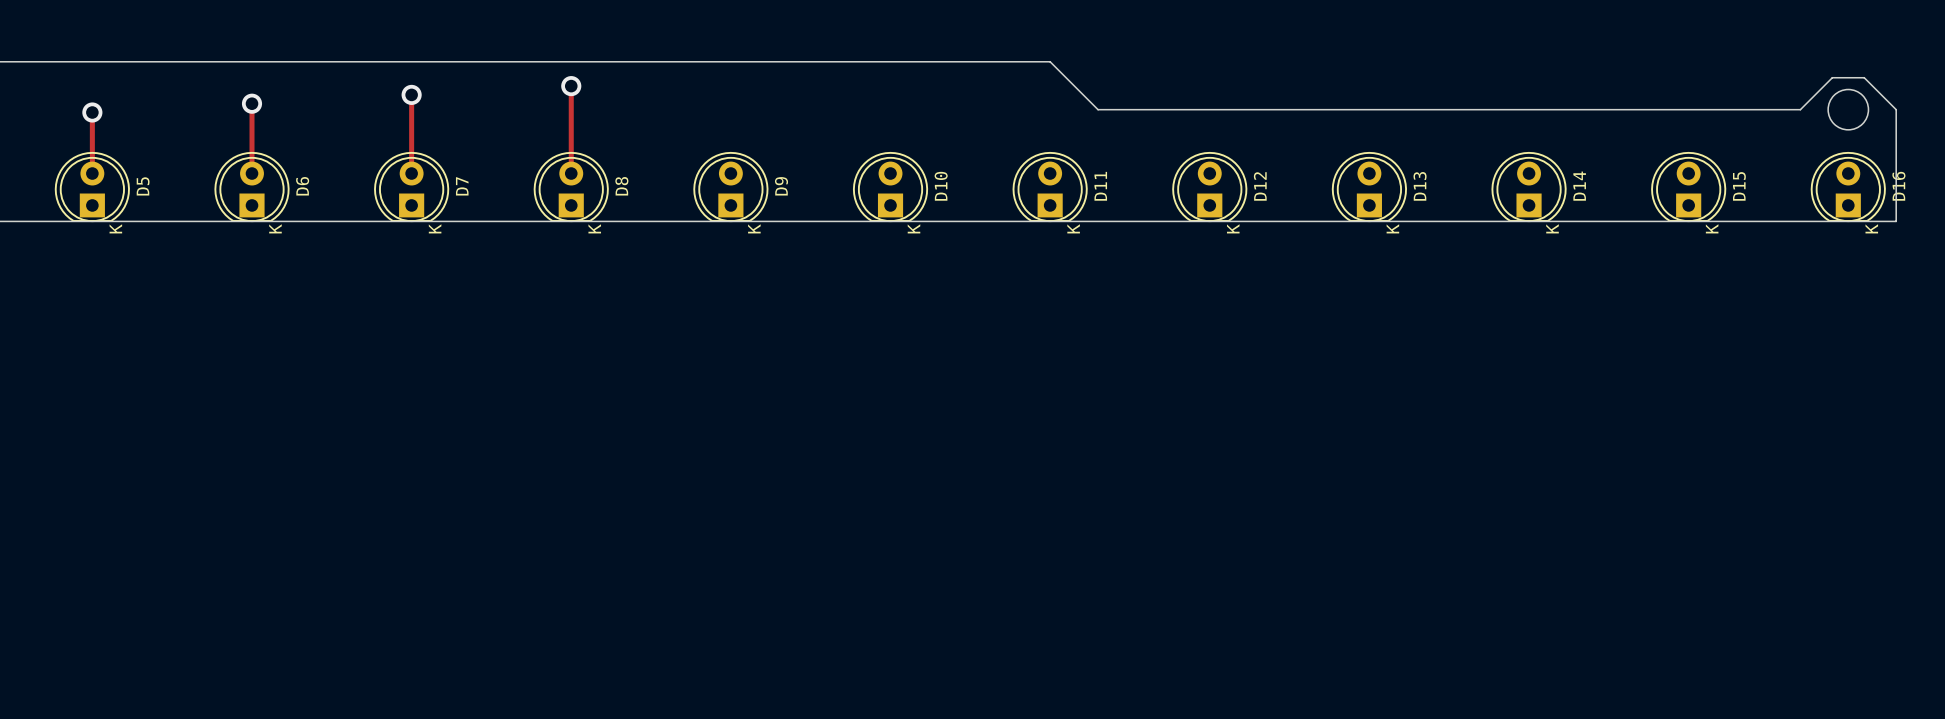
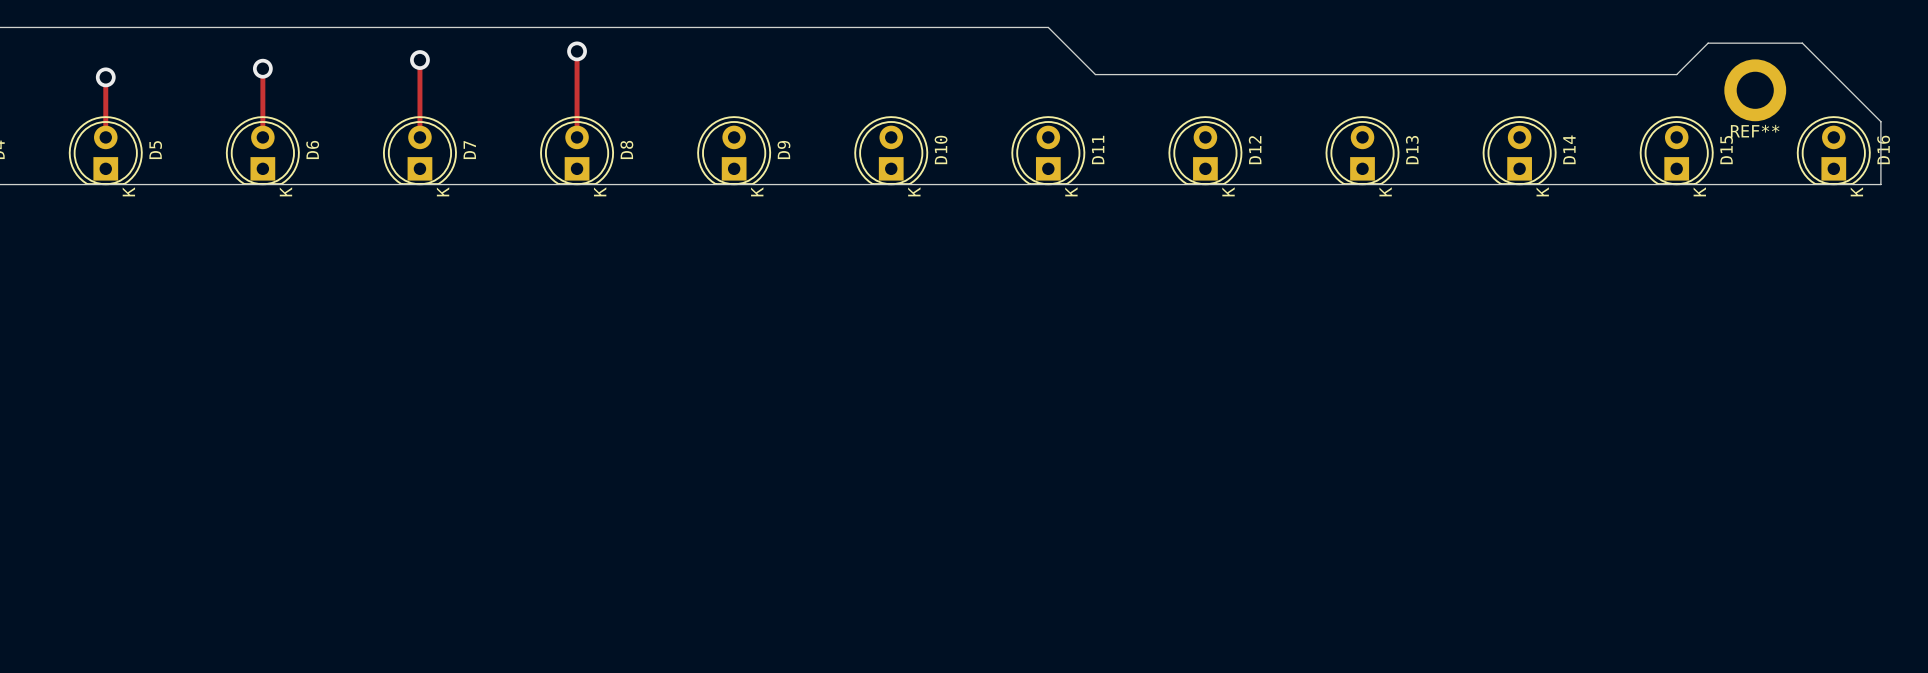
round board edge: [1827, 88, 1870, 131] -> none
board edge: (1688, 109) (1800, 109) (1832, 77) (1864, 77) (1896, 109) (1896, 157) -> (1676, 74) (1708, 43) (1802, 43) (1880, 121)
REF**: none -> (1755, 90)

